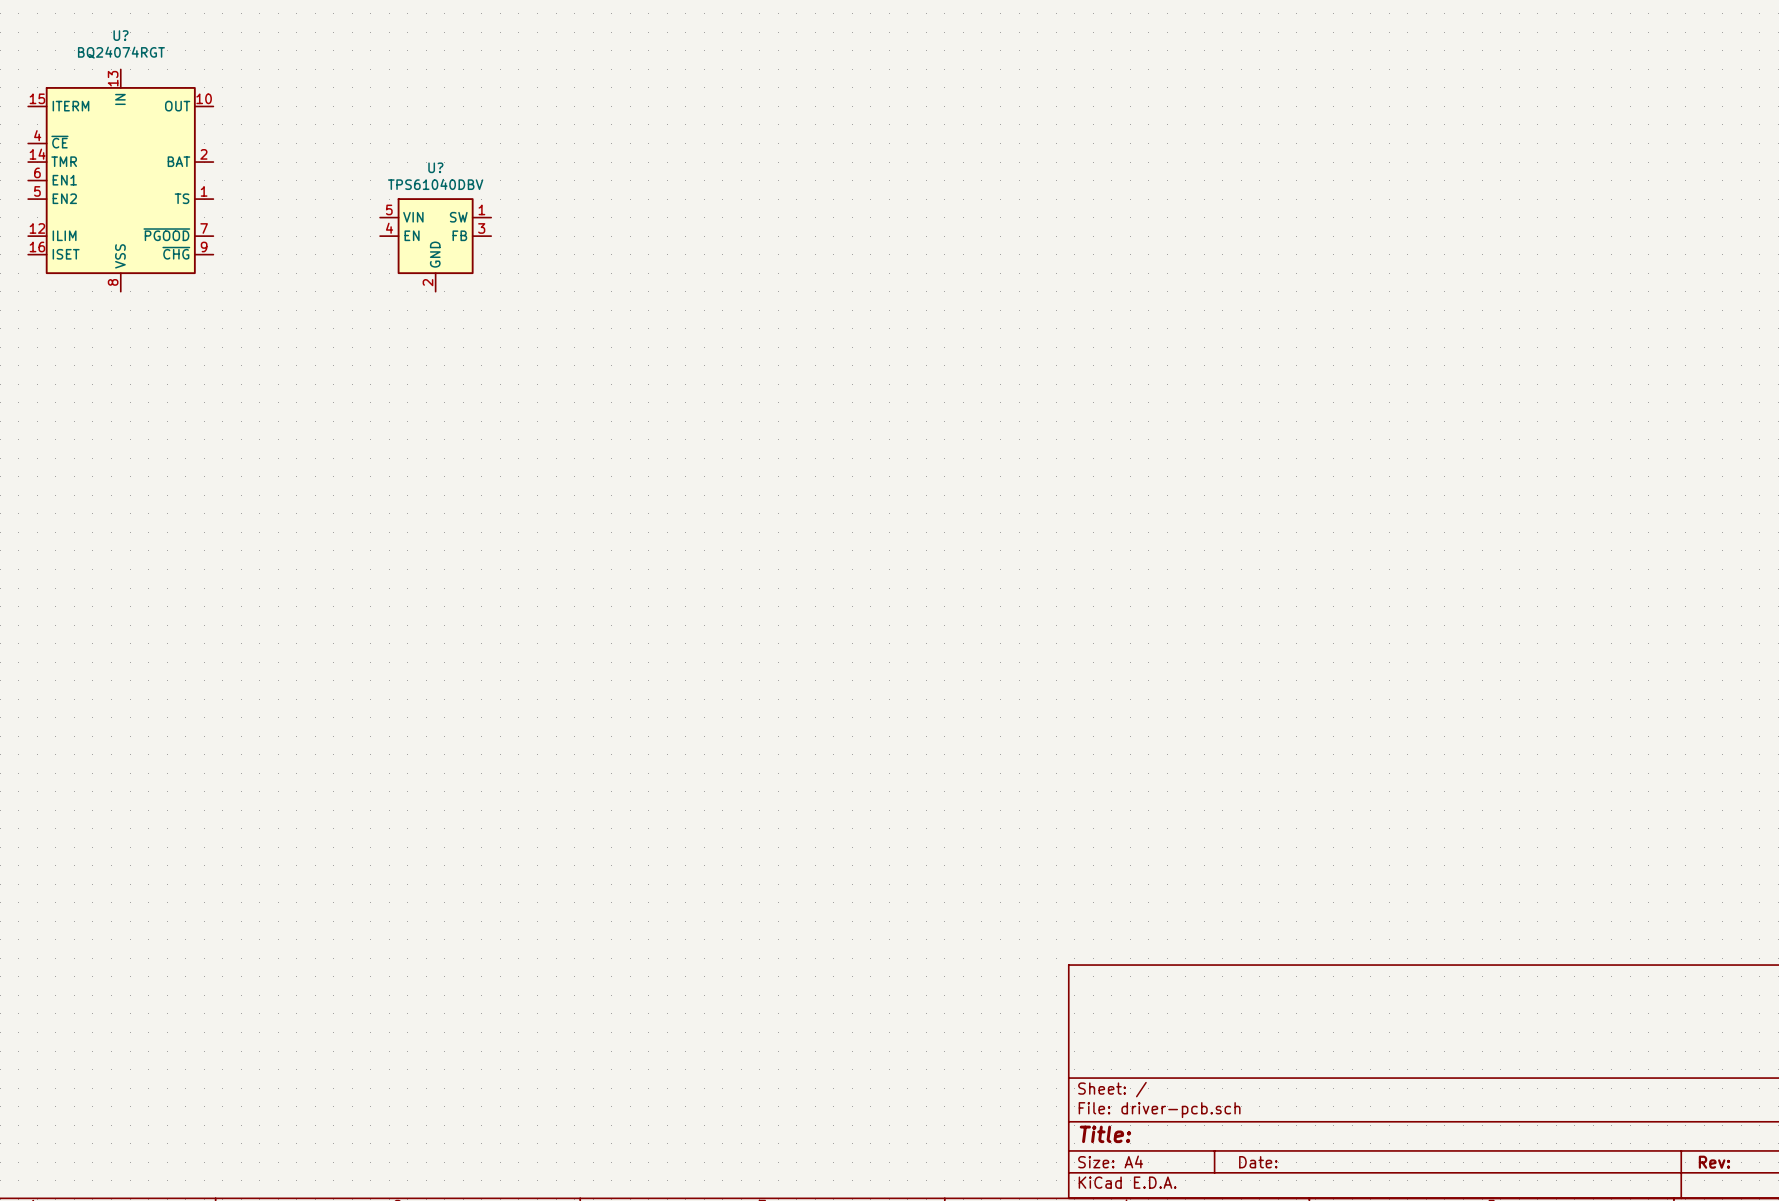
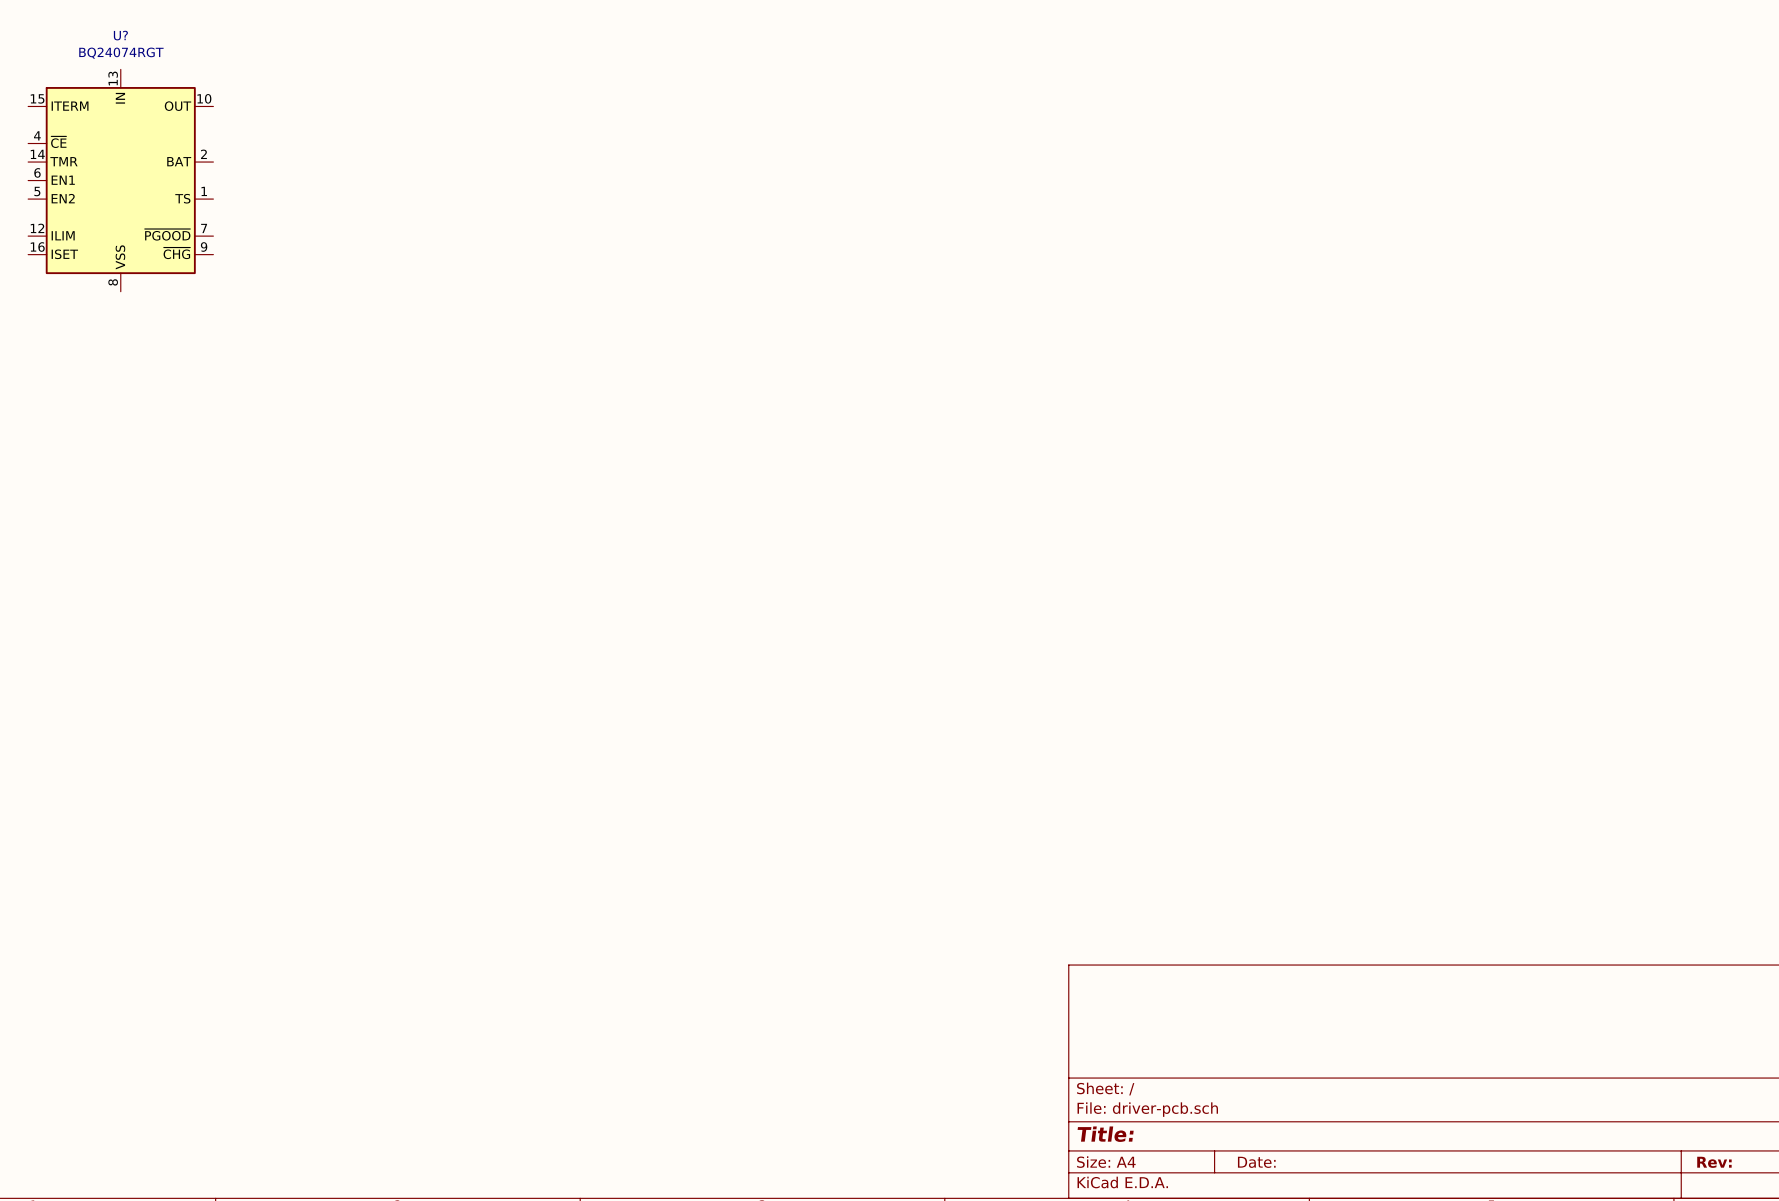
U?: TPS61040DBV (435, 244) -> none

